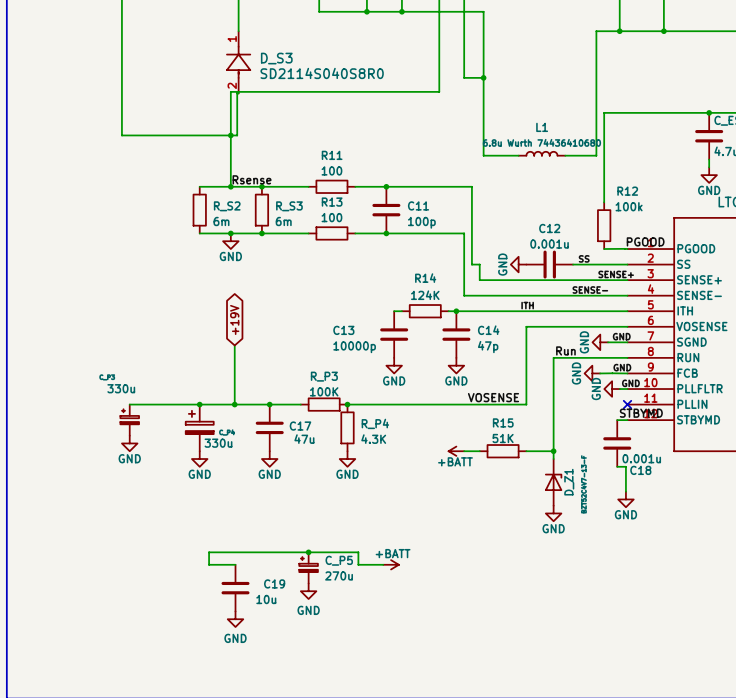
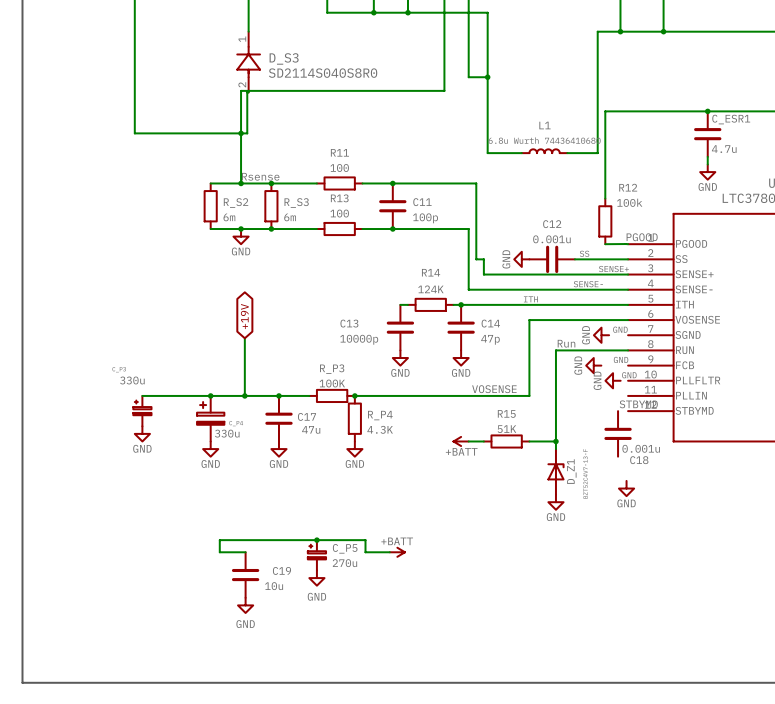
wire: (608, 342) (627, 342) -> none
wire: (600, 373) (627, 373) -> none
wire: (619, 389) (627, 389) -> none
no-connect mark: (627, 404) -> none
wire: (617, 420) (627, 420) -> none
wire: (617, 466) (625, 466) (625, 491) -> none

